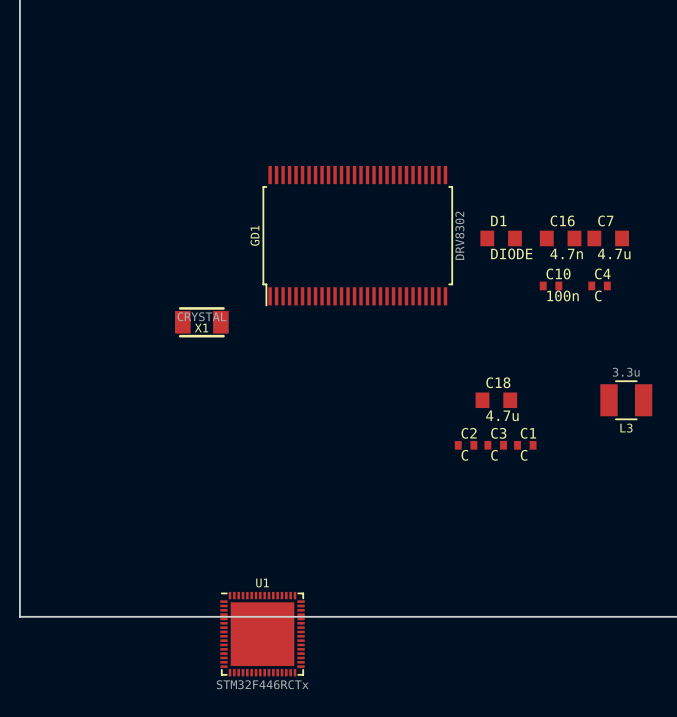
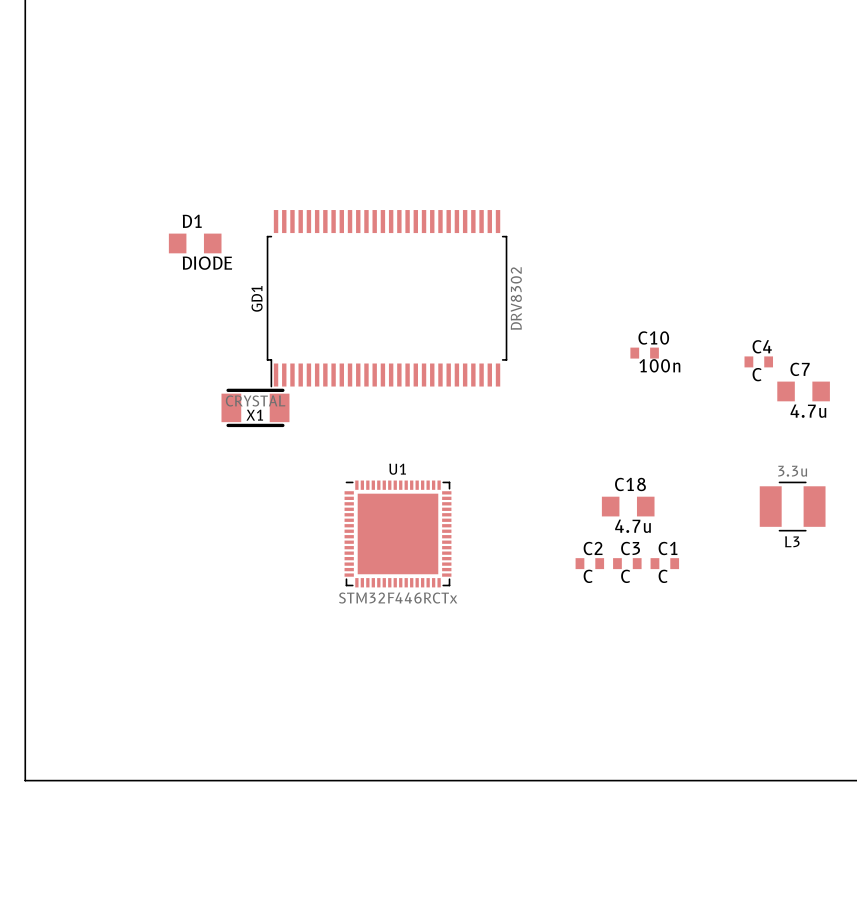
GD1 position: (357, 236) -> (387, 298)
D1 position: (501, 238) -> (195, 243)
C16: 4.7n (560, 238) -> none
C7 position: (608, 238) -> (803, 391)
C10 position: (551, 285) -> (644, 353)
U1 position: (262, 634) -> (397, 533)

